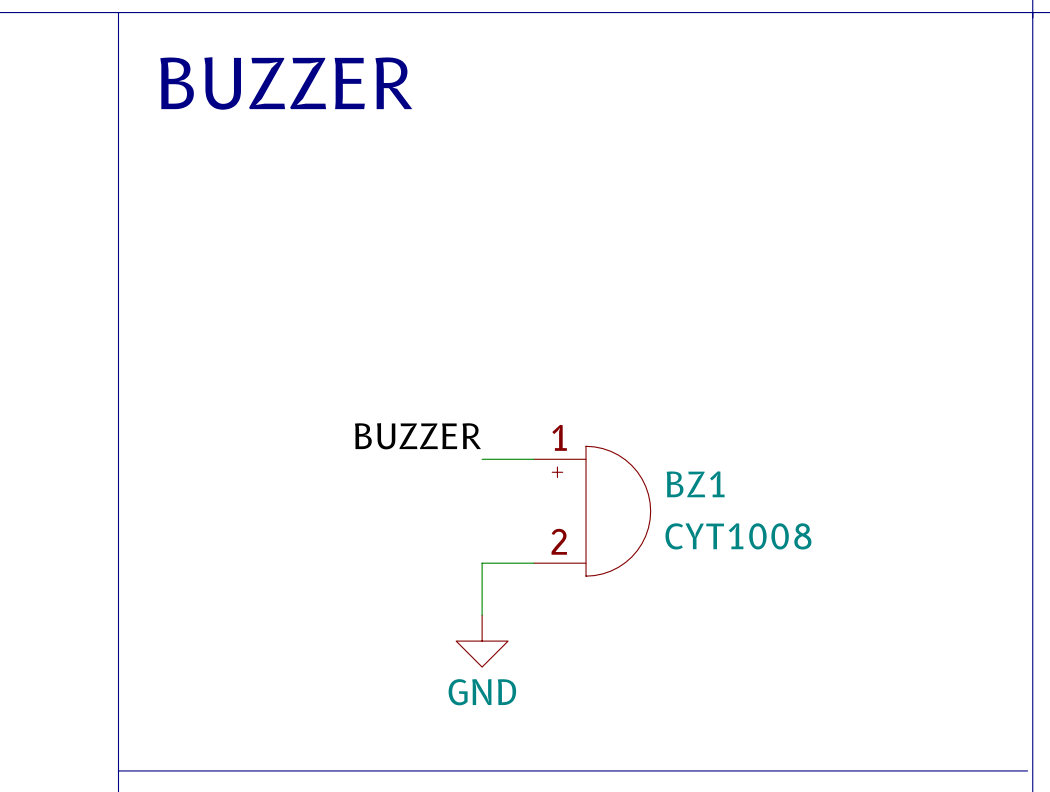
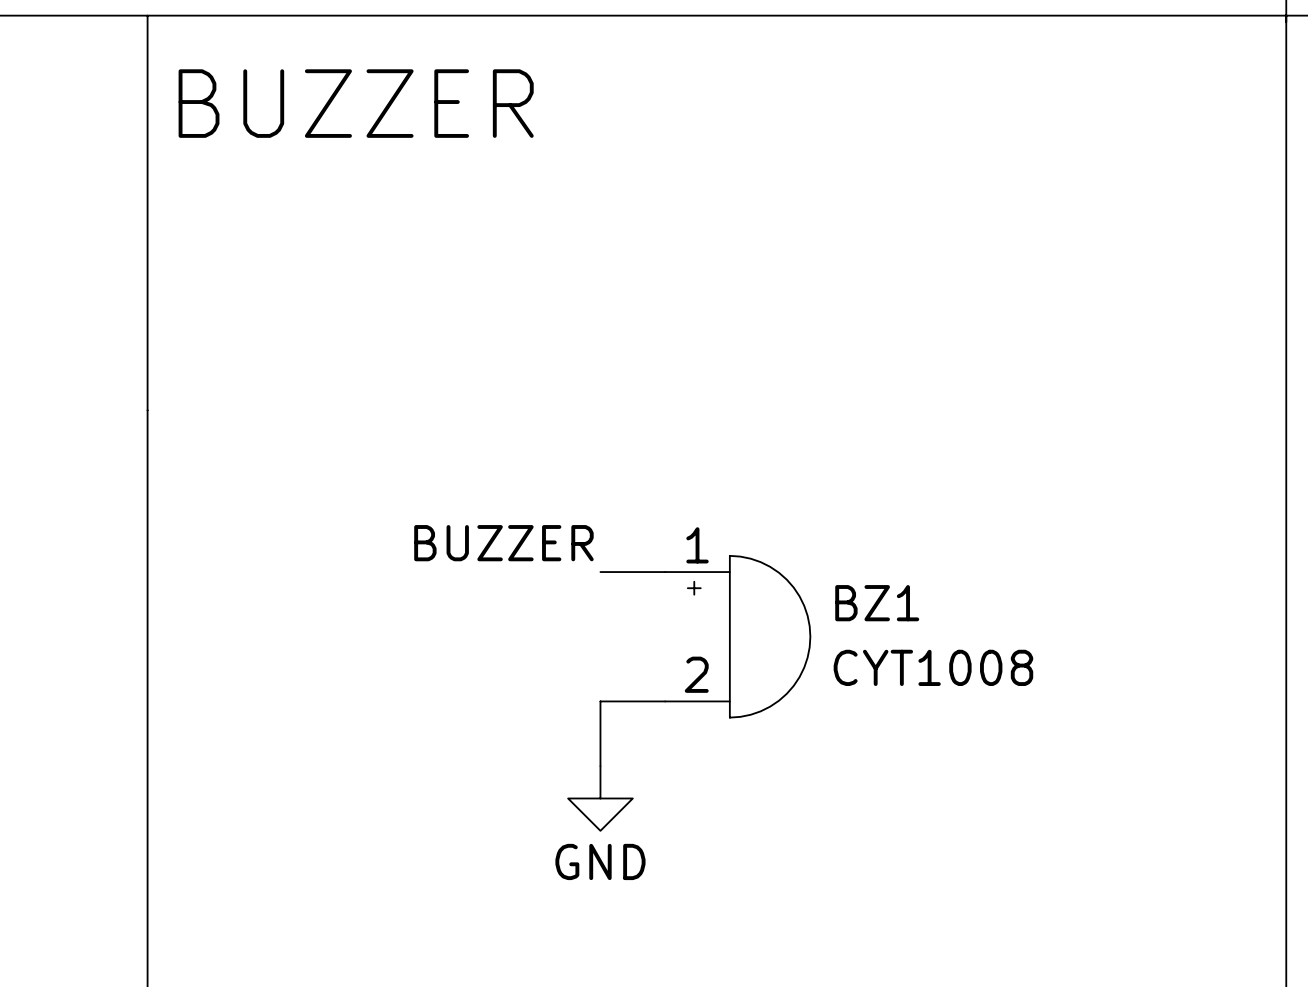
line: (118, 770) (1027, 770) -> none

